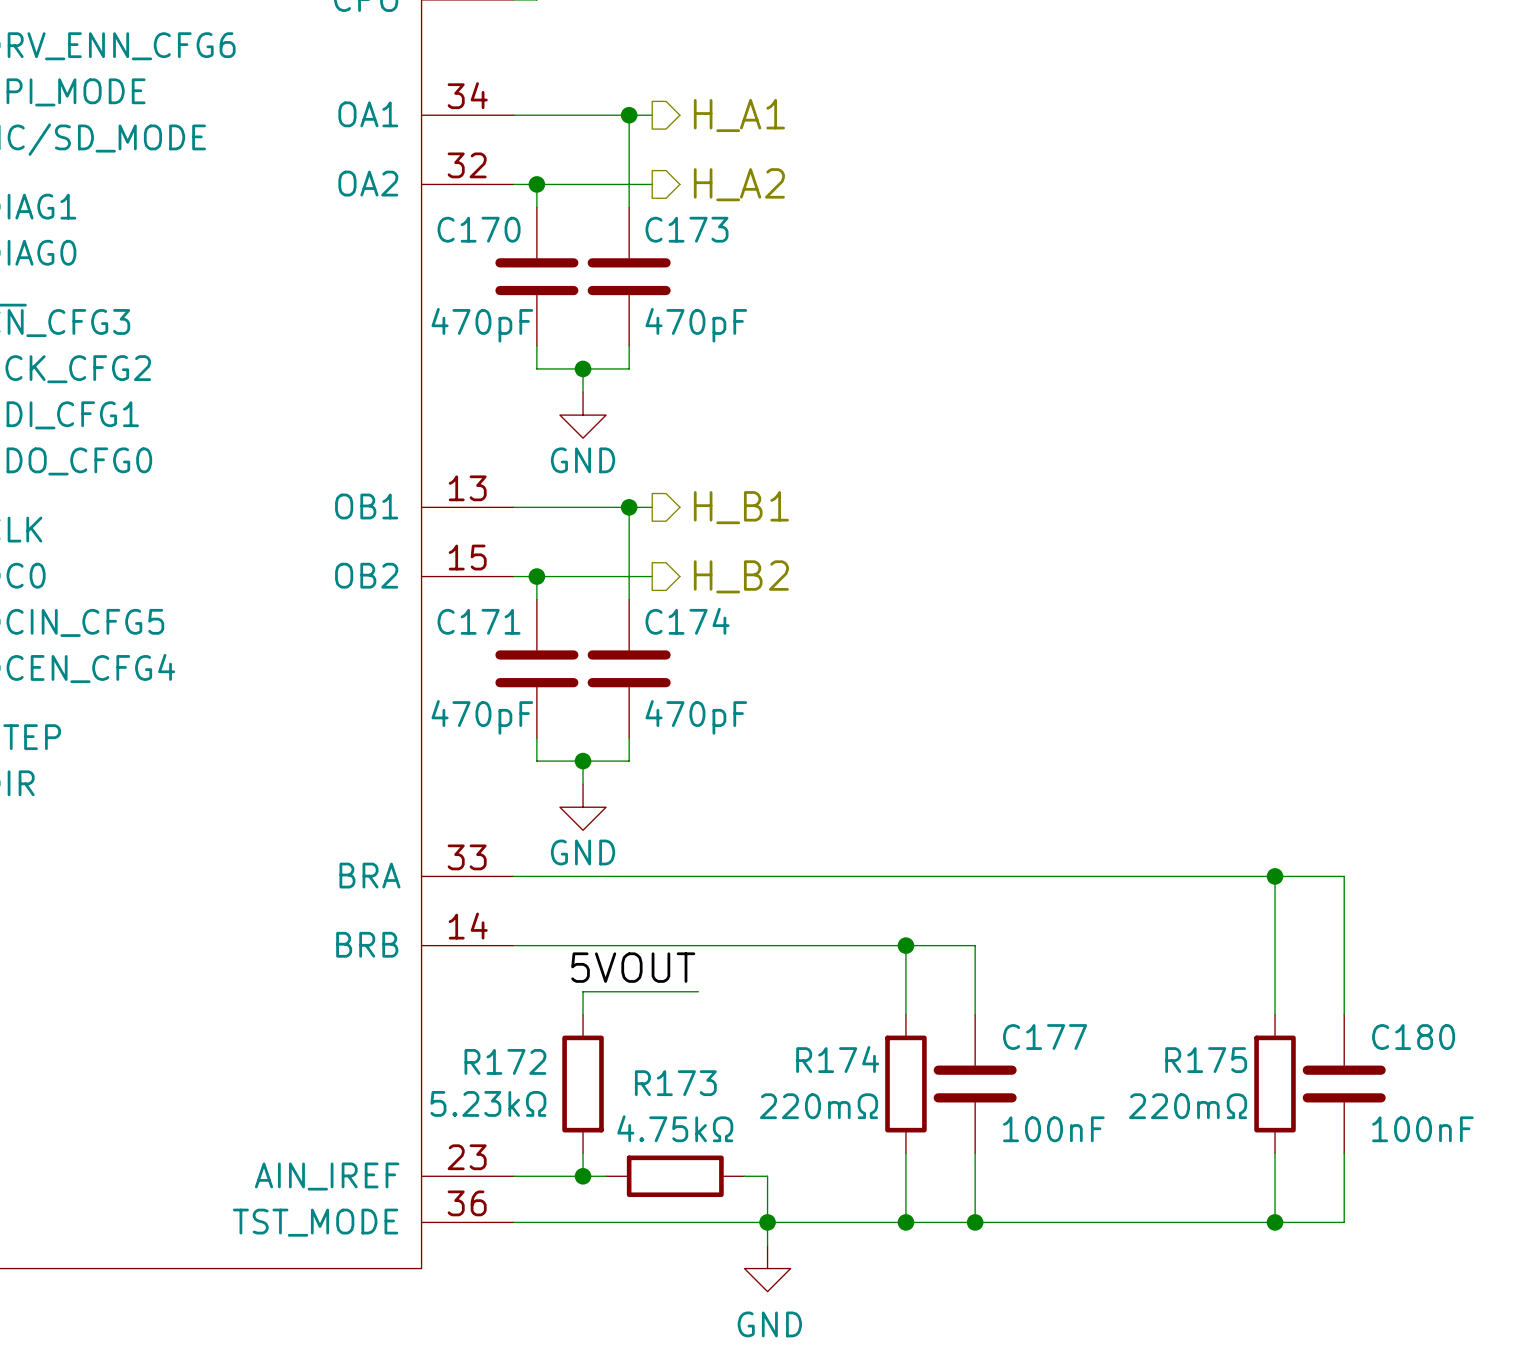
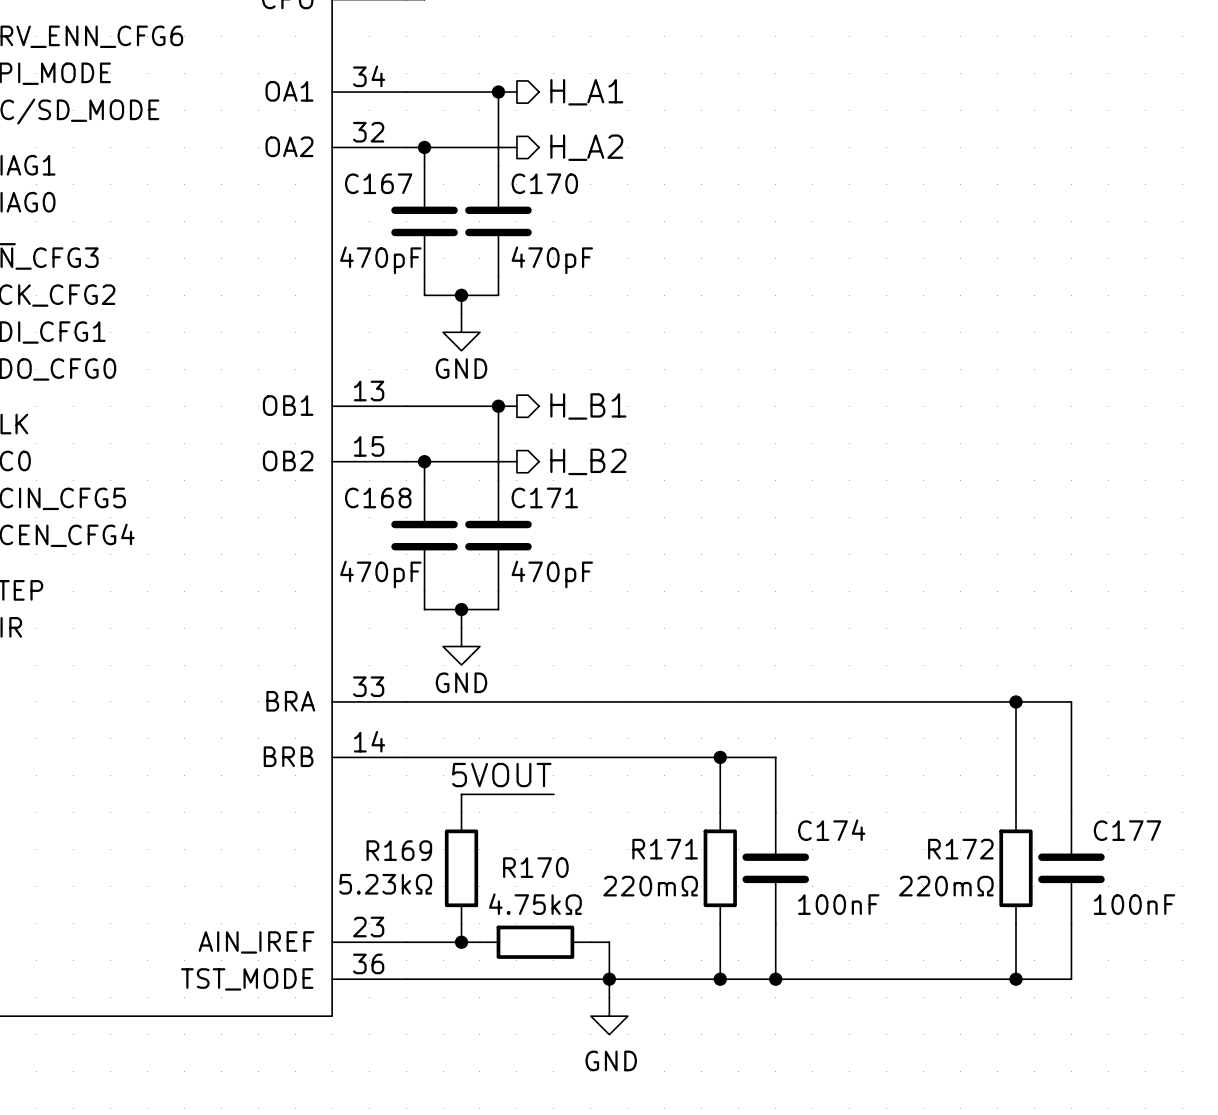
C170 name: C170 (479, 229) -> C167 (378, 183)
C173 name: C173 (686, 229) -> C170 (544, 183)
C171 name: C171 (479, 621) -> C168 (378, 497)
C174 name: C174 (687, 621) -> C171 (544, 497)
C177 name: C177 (1045, 1037) -> C174 (831, 830)
C180 name: C180 (1413, 1037) -> C177 (1127, 830)
R174 name: R174 (837, 1059) -> R171 (665, 849)
R175 name: R175 (1206, 1060) -> R172 (960, 849)
R172 name: R172 (505, 1061) -> R169 (399, 850)
R173 name: R173 (675, 1083) -> R170 (535, 867)

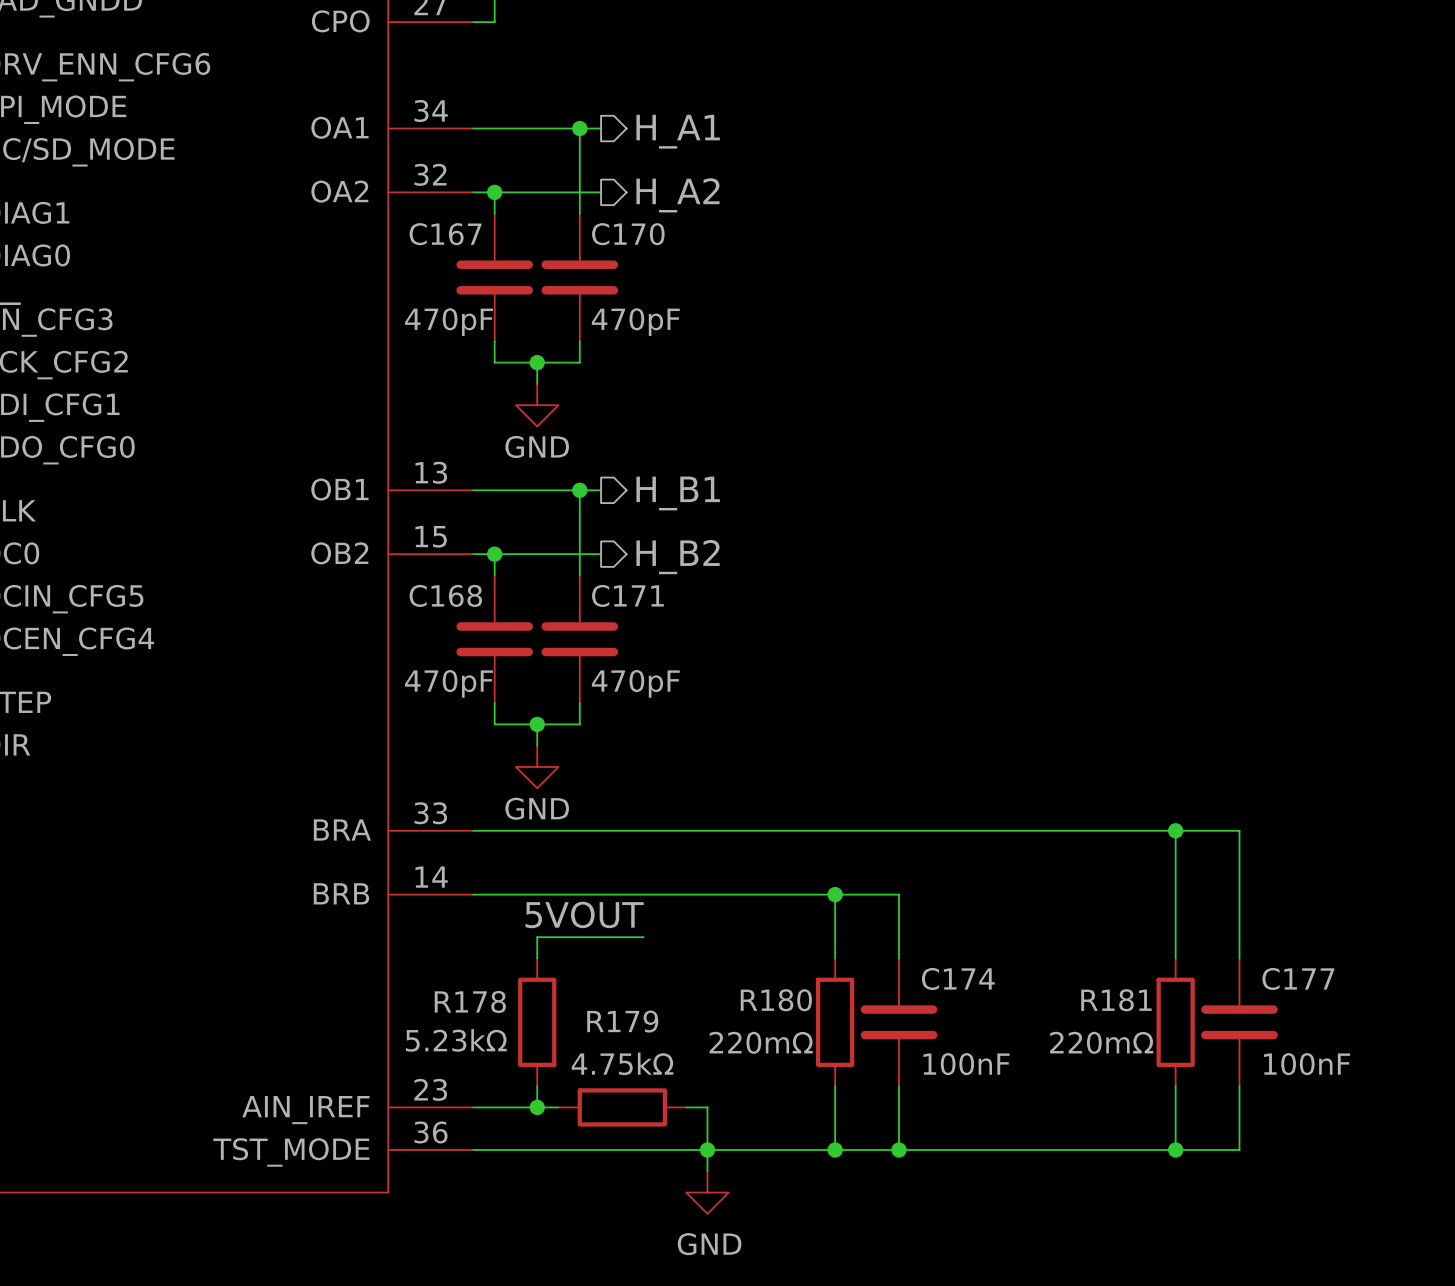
R171 name: R171 (665, 849) -> R180 (776, 1000)
R172 name: R172 (960, 849) -> R181 (1116, 1000)
R169 name: R169 (399, 850) -> R178 (470, 1001)
R170 name: R170 (535, 867) -> R179 (622, 1021)

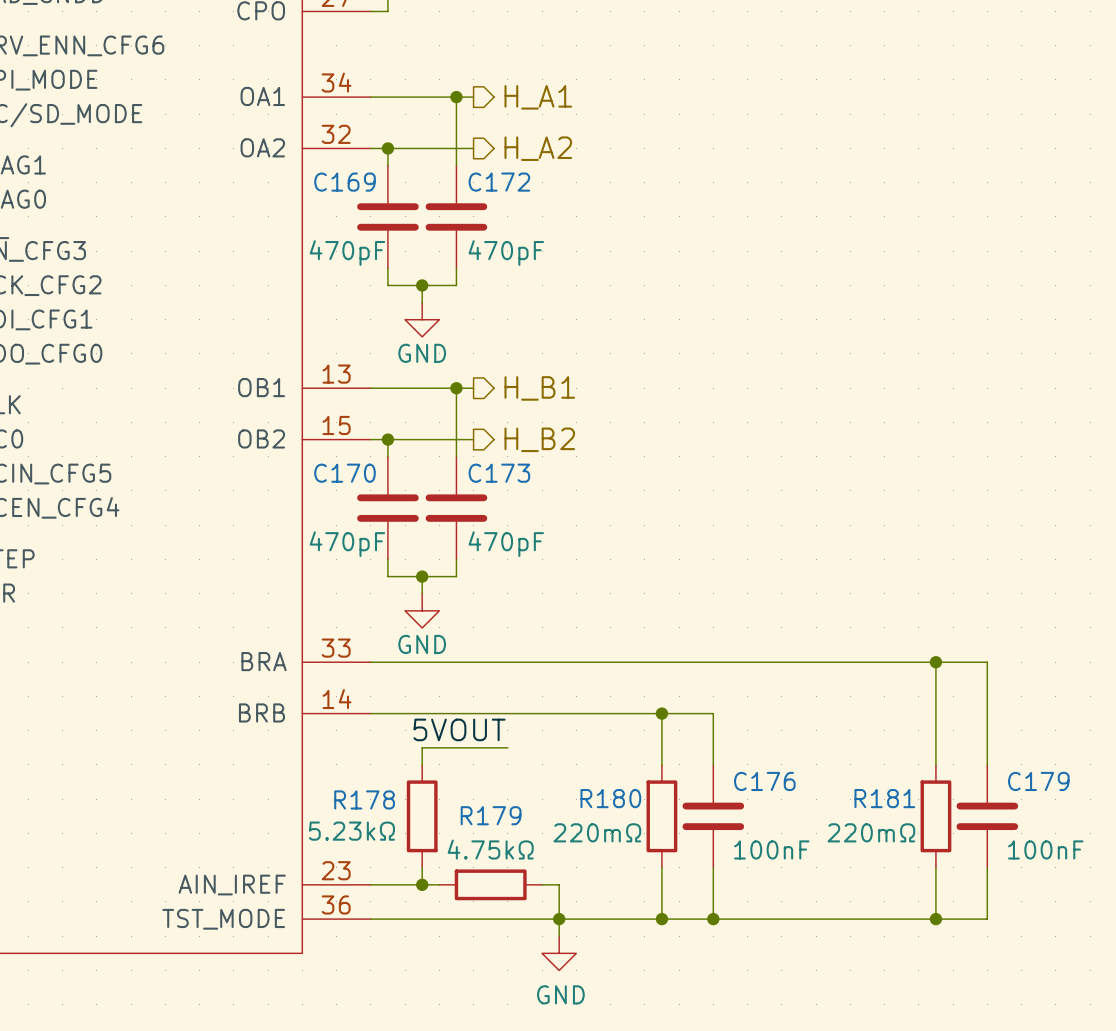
C167 name: C167 (445, 234) -> C169 (345, 182)
C170 name: C170 (628, 234) -> C172 (499, 182)
C168 name: C168 (445, 595) -> C170 (345, 473)
C171 name: C171 (627, 595) -> C173 (499, 473)
C174 name: C174 (958, 978) -> C176 (764, 781)
C177 name: C177 (1298, 978) -> C179 (1038, 781)

